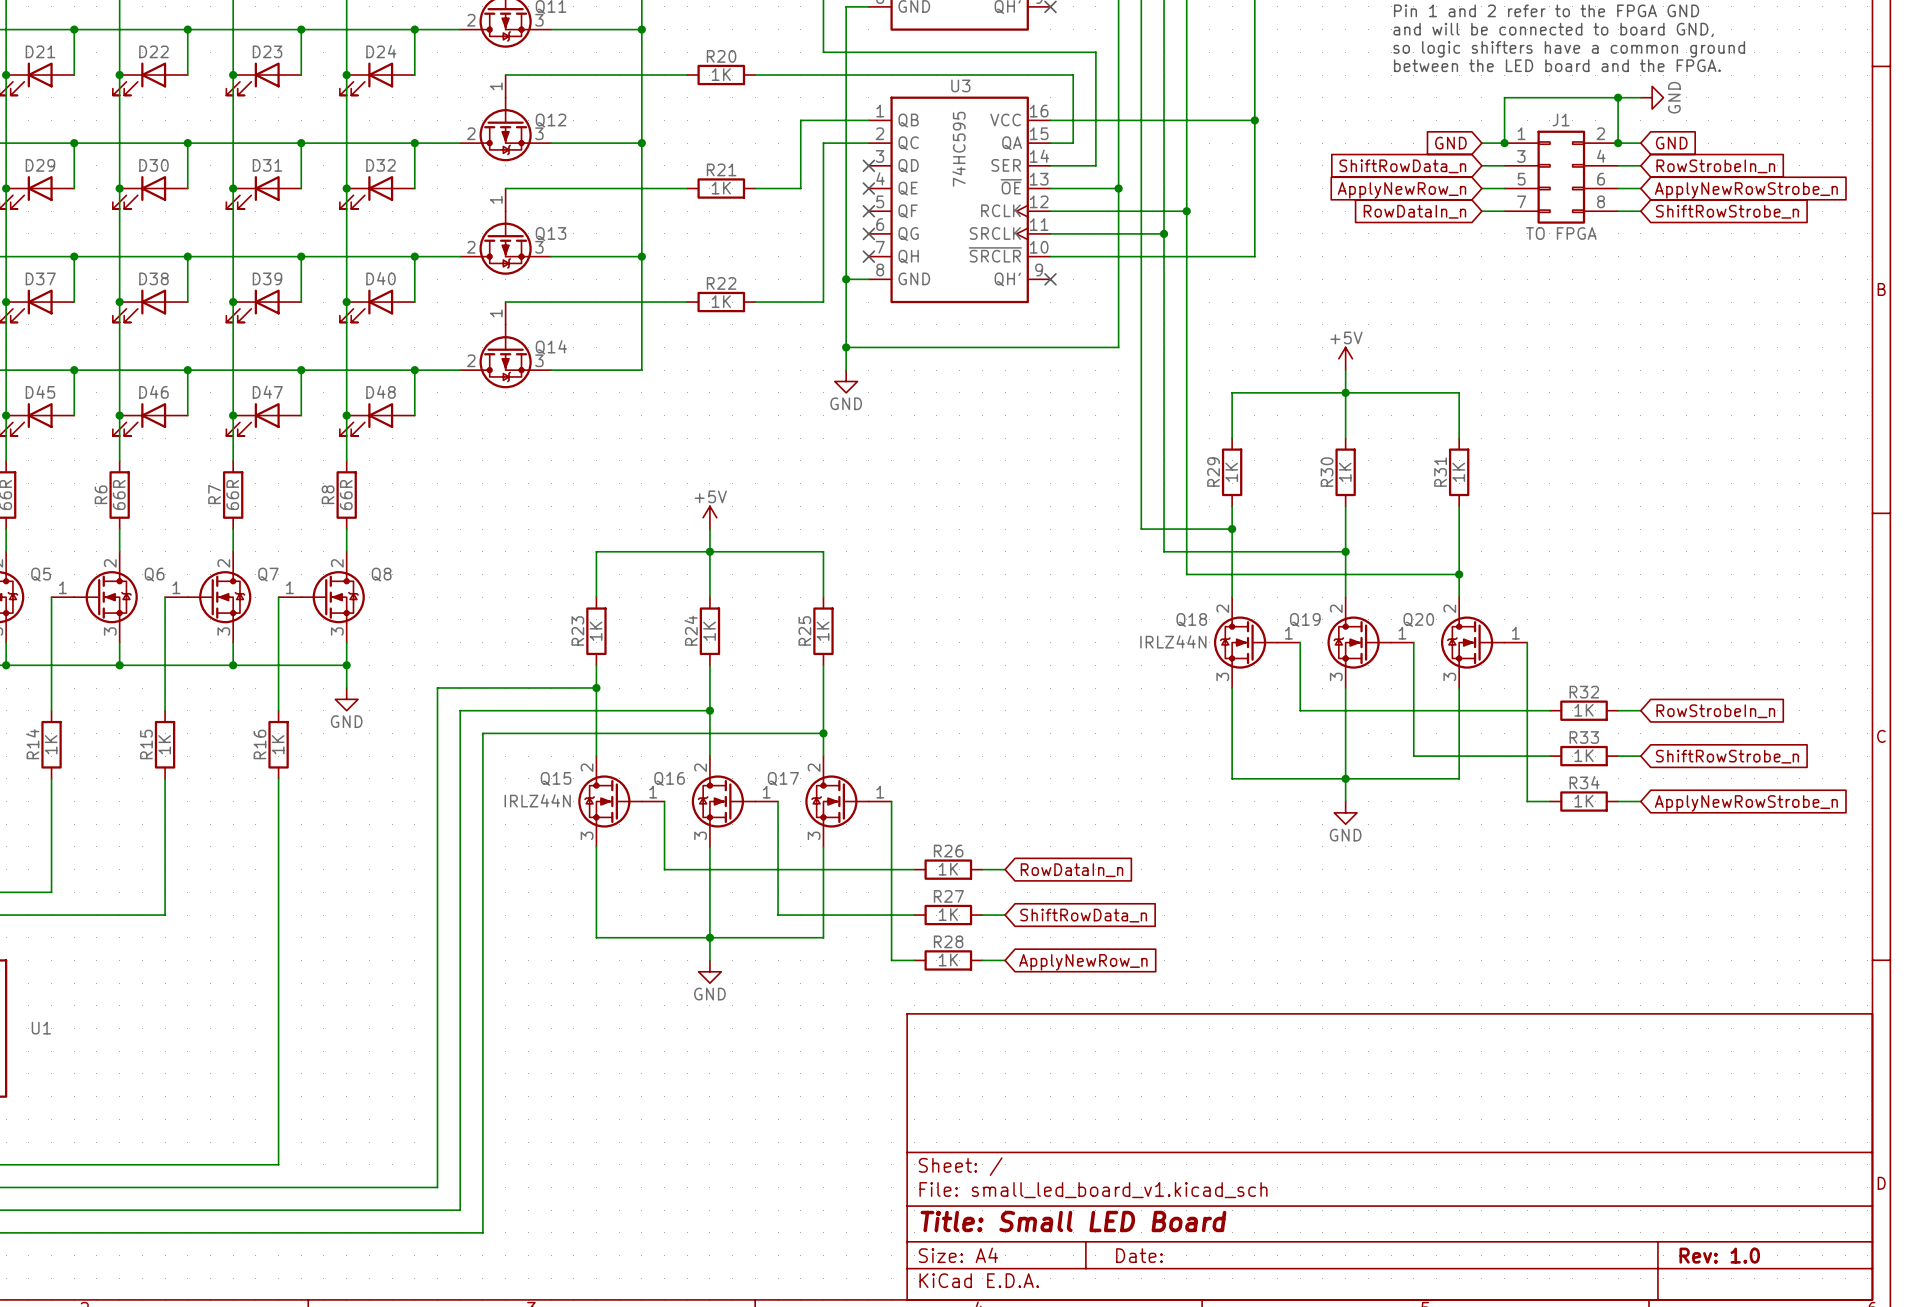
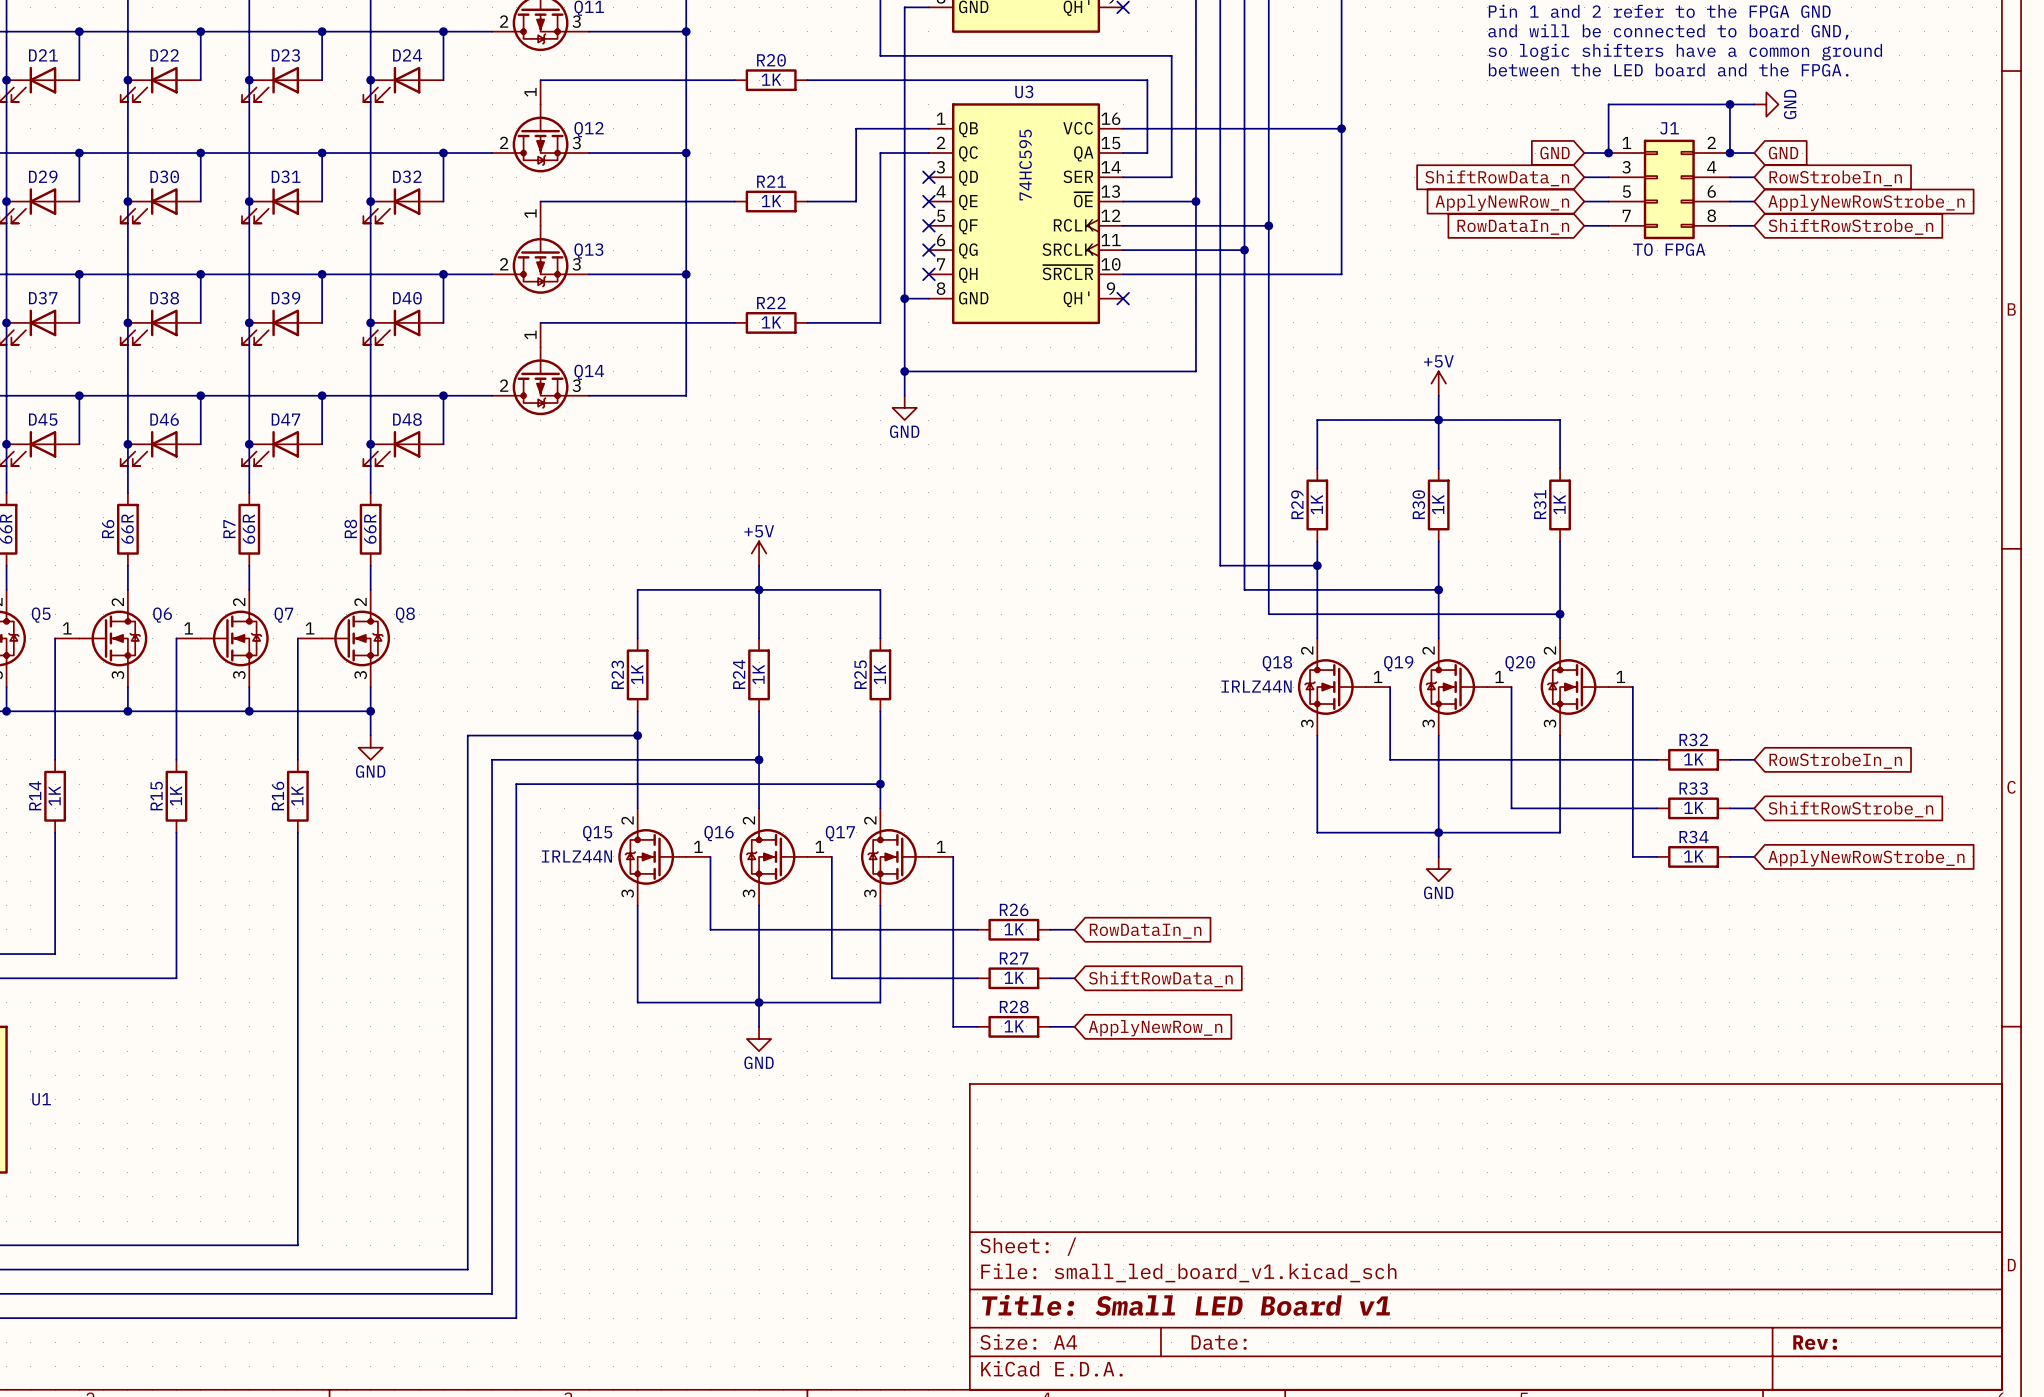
title block: Title: Small LED Board (1073, 1221) -> Title: Small LED Board v1 (1186, 1305)
title block: Rev: 1.0 (1719, 1255) -> Rev: (1815, 1342)

